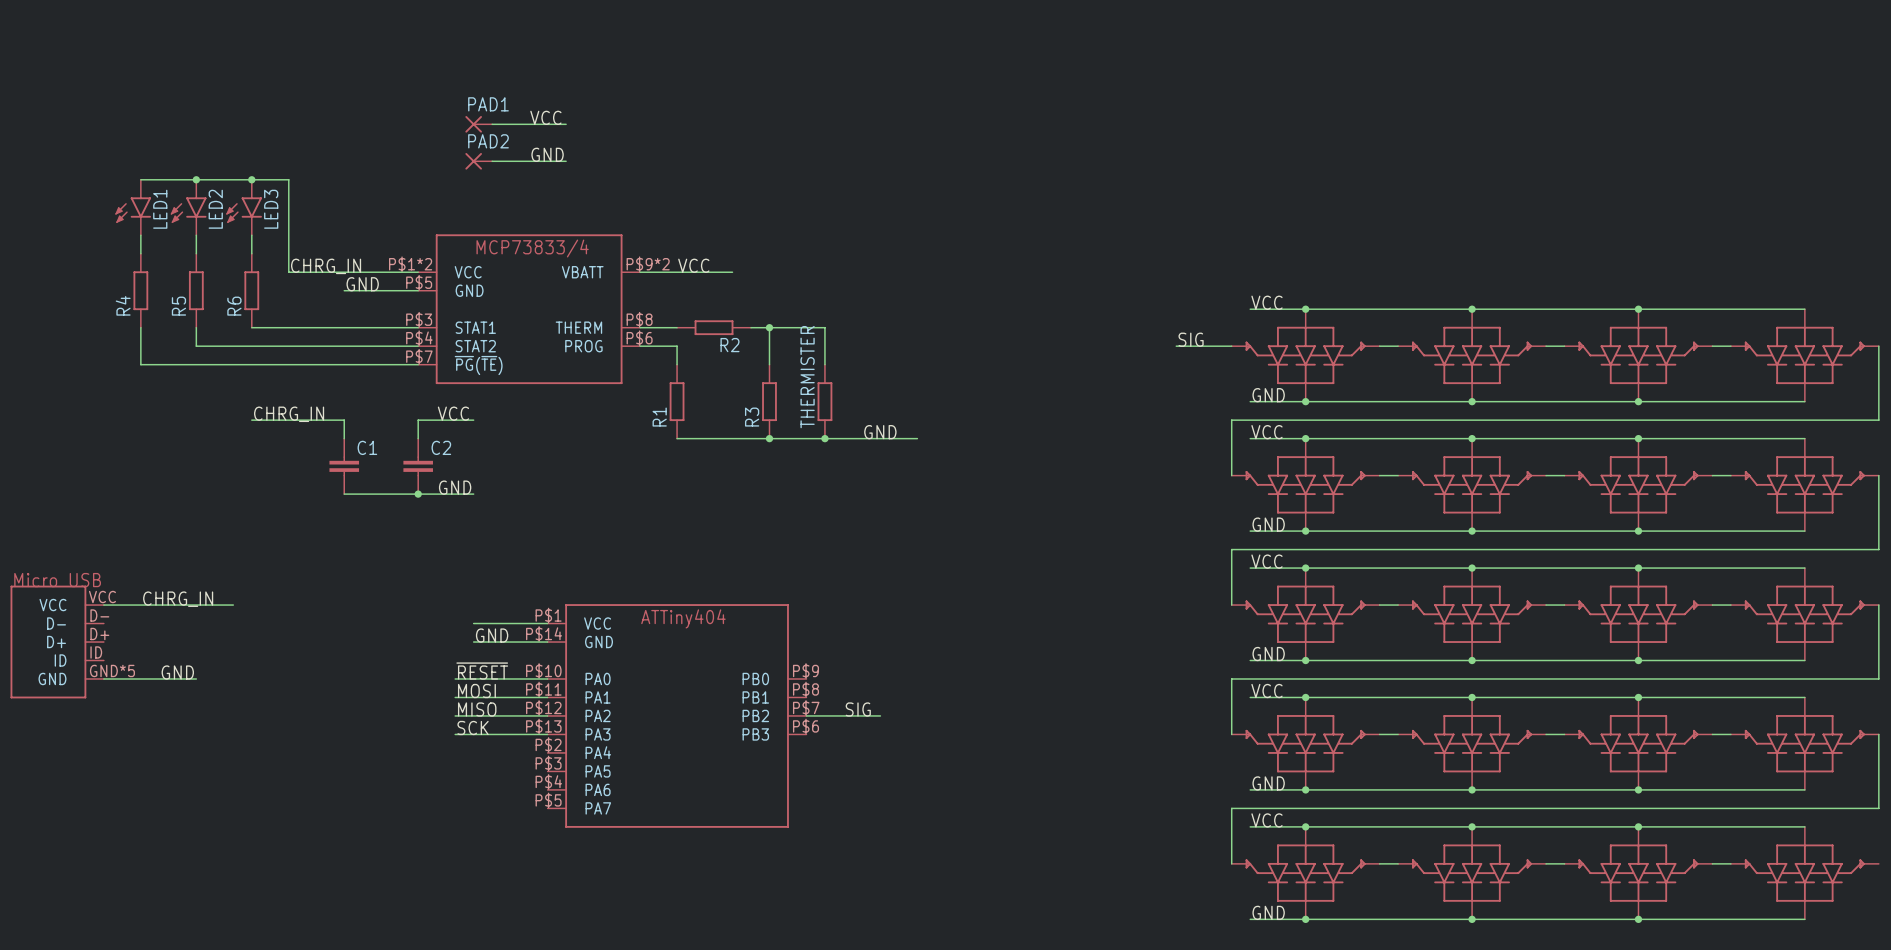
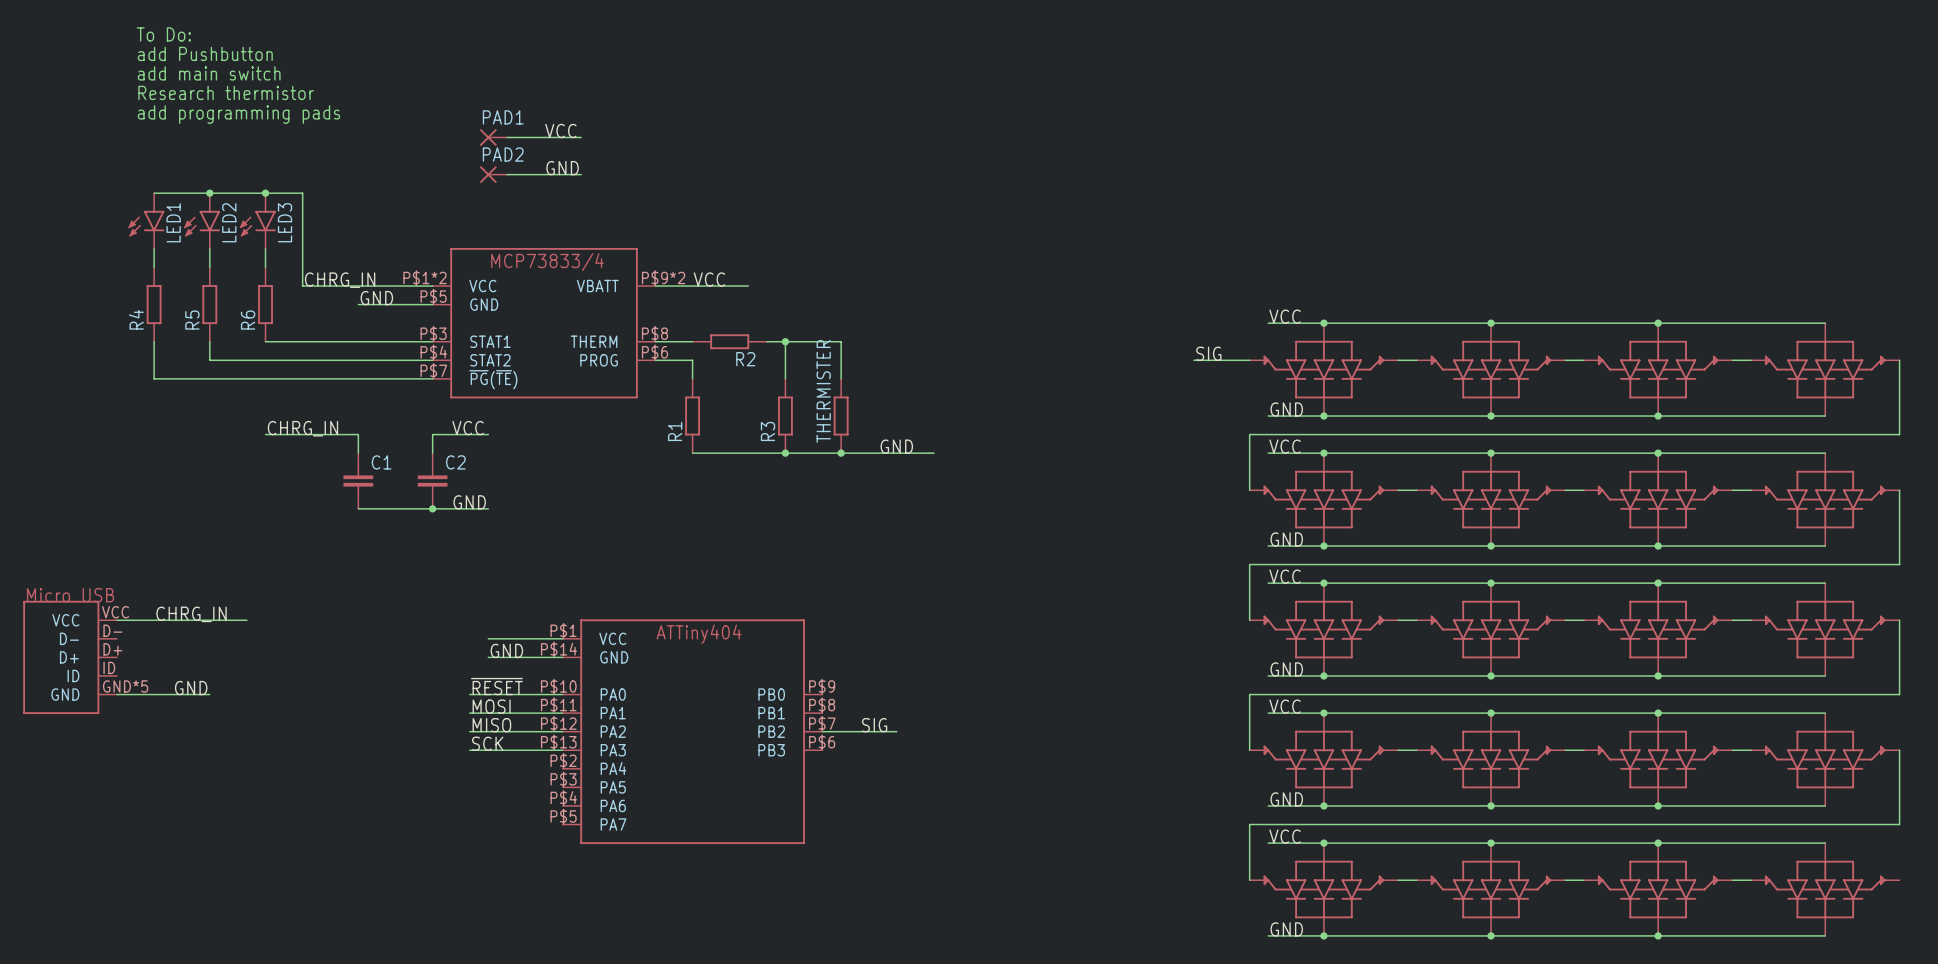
text: none -> To Do: (163, 34)
text: none -> add Pushbutton (205, 53)
text: none -> add main switch (209, 73)
text: none -> Research thermistor (226, 92)
text: none -> add programming pads (238, 114)

